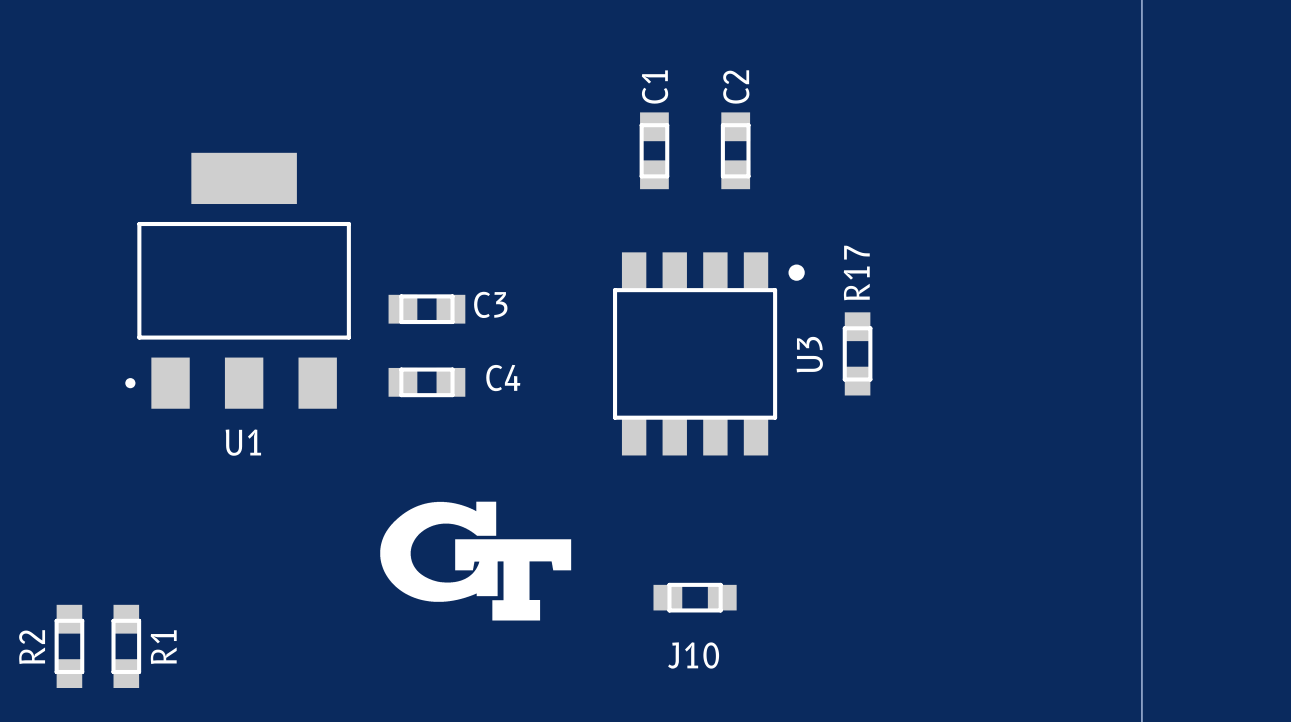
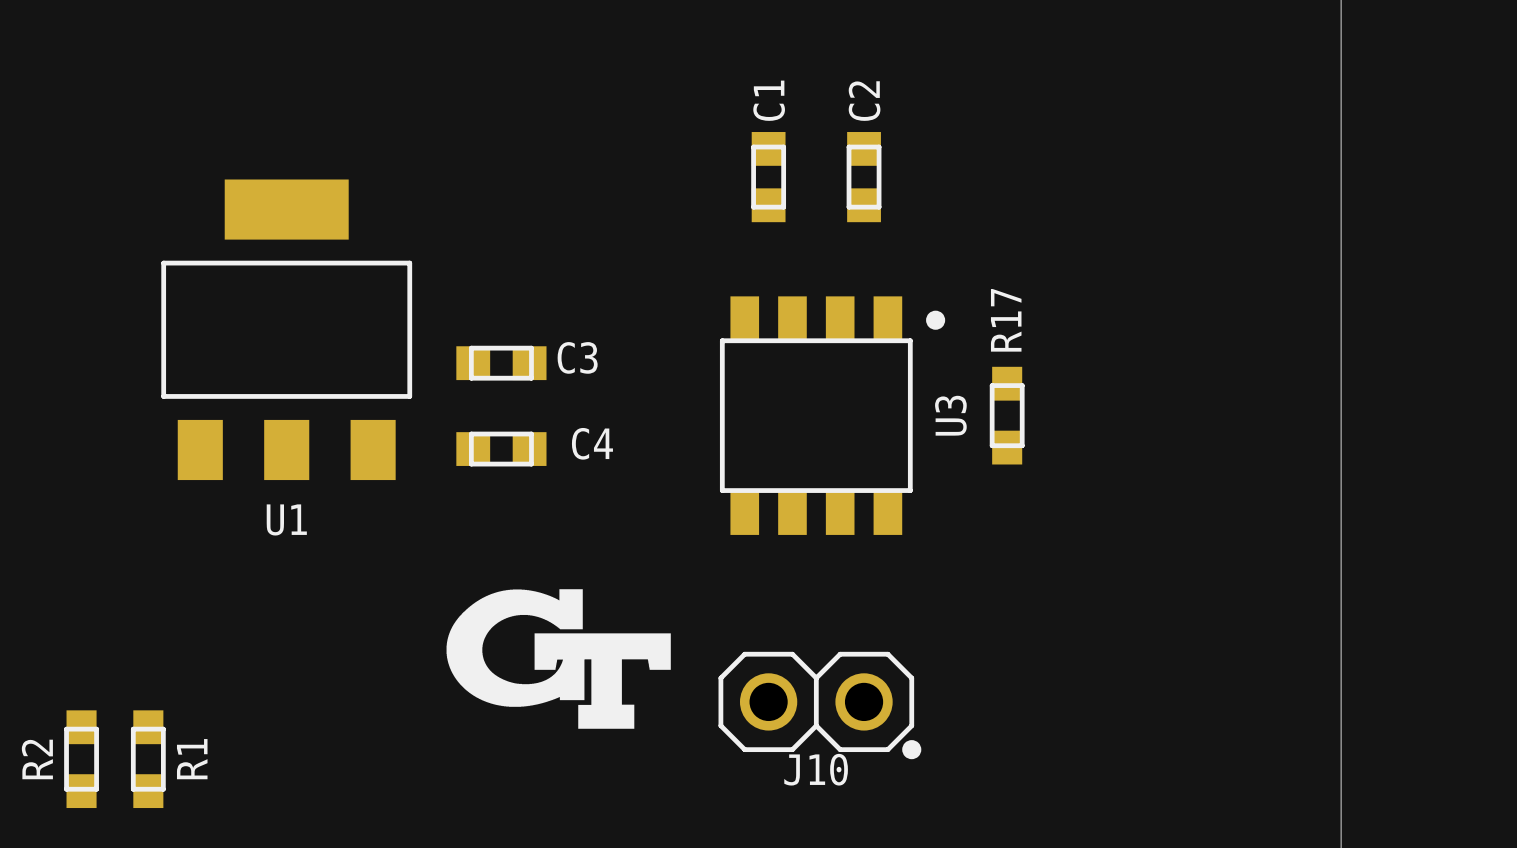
U1 footprint: [125, 152, 351, 409] -> [161, 179, 413, 481]
J10 footprint: [653, 582, 737, 613] -> [718, 651, 922, 760]

